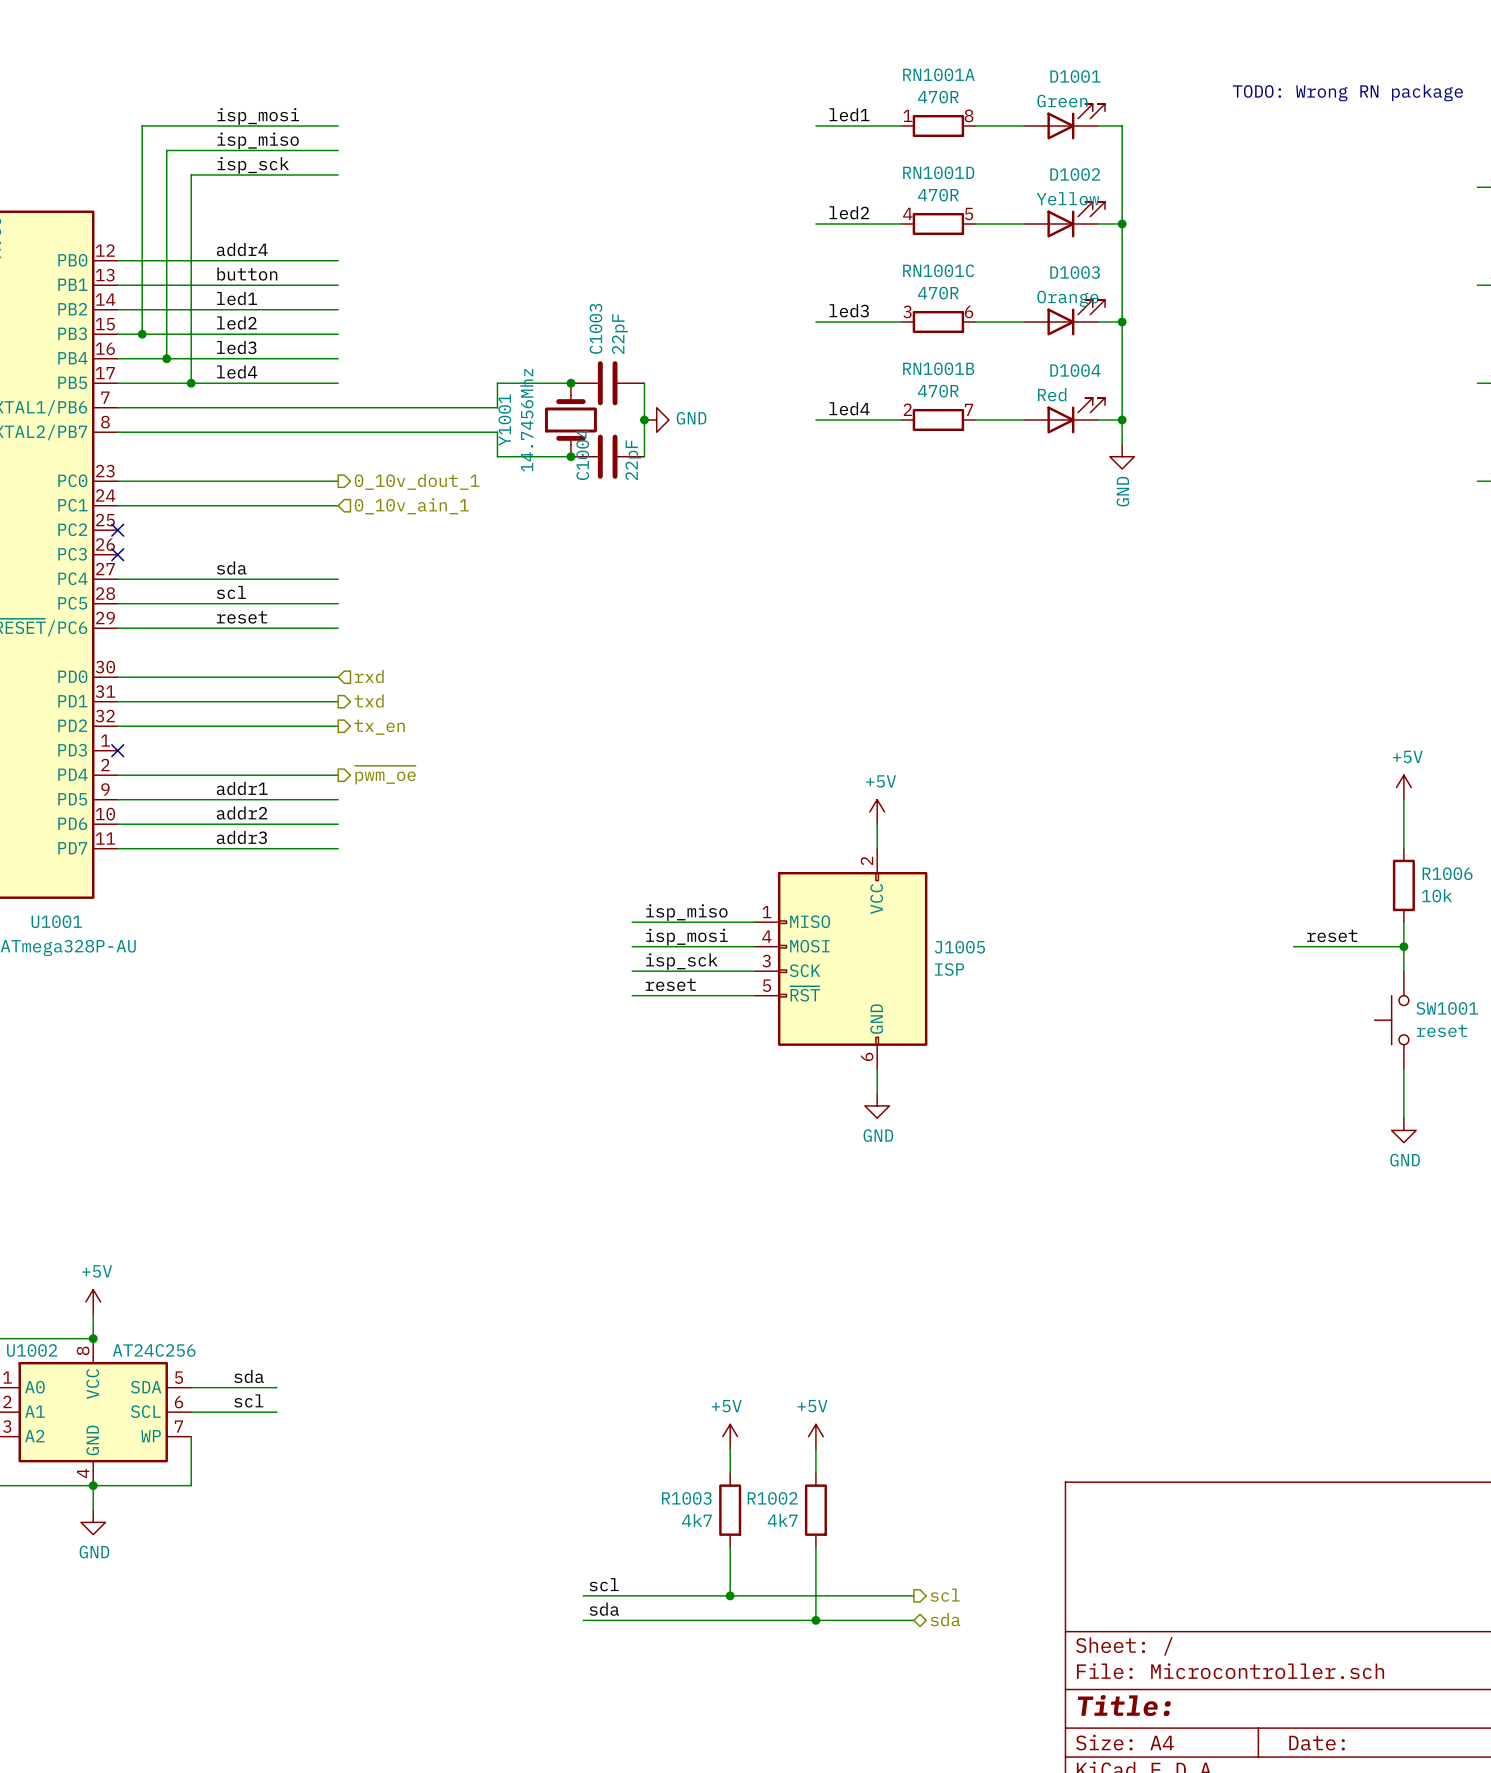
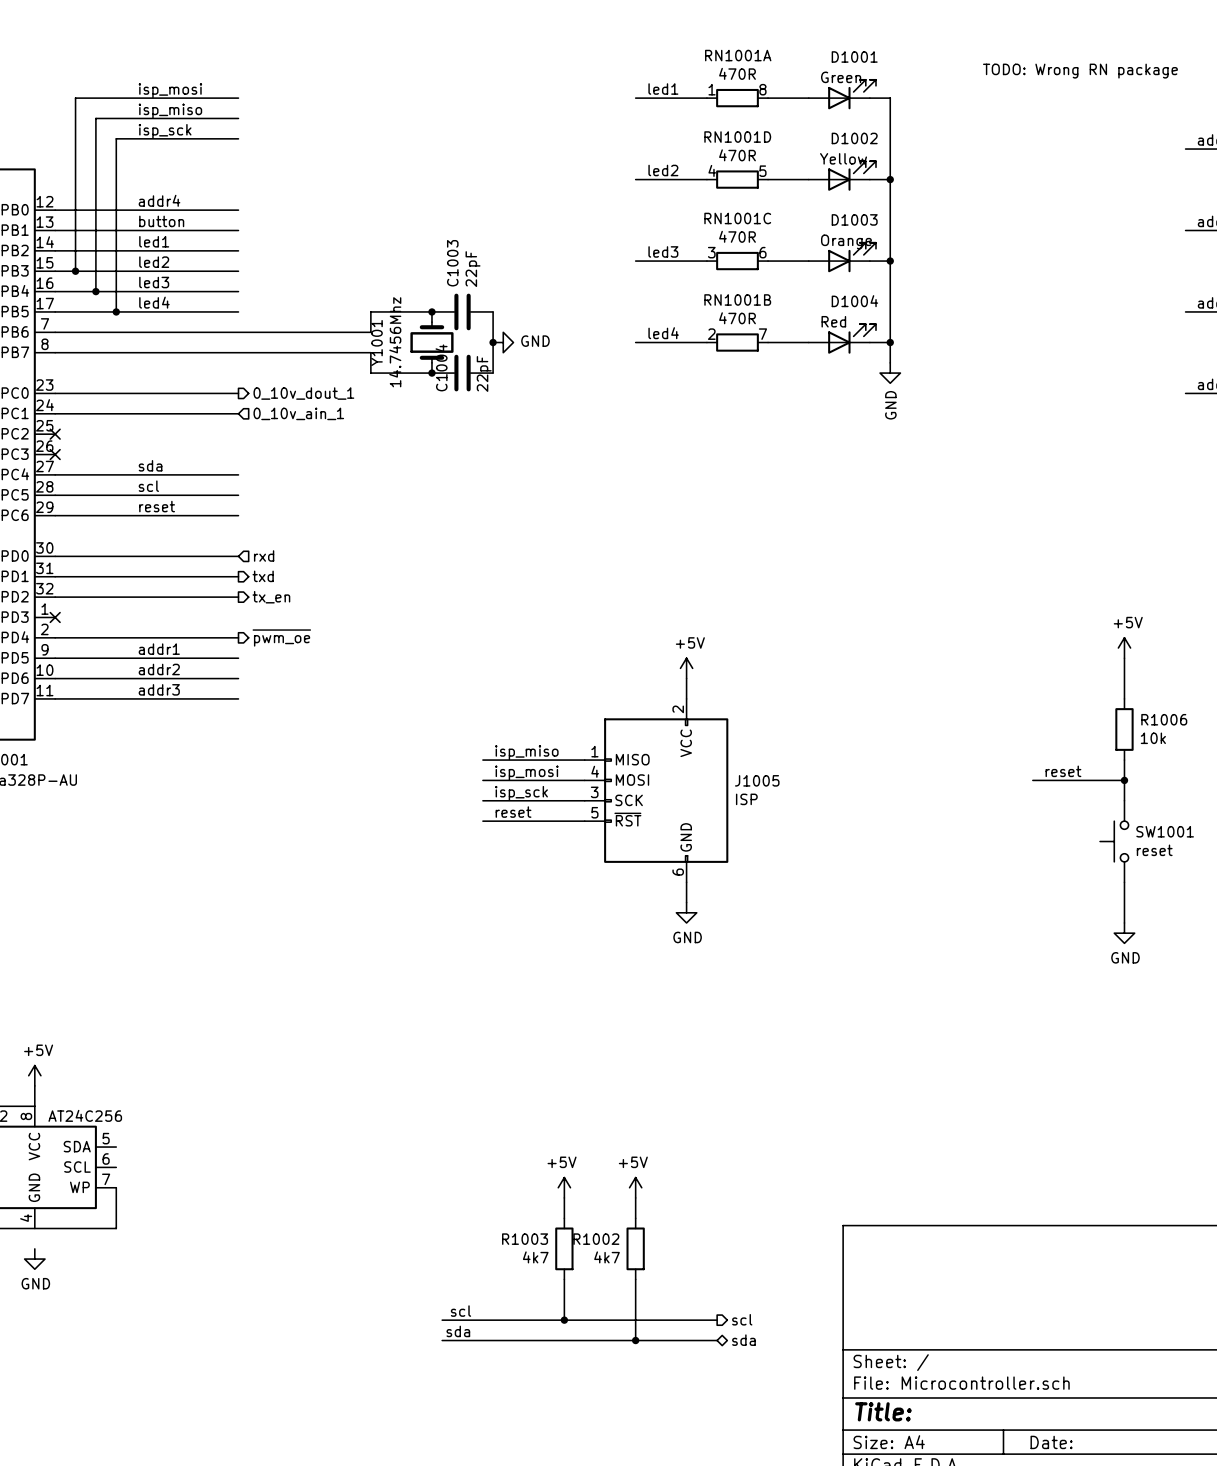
junction: (93, 1338) -> none
label: sda (249, 1376) -> none
wire: (191, 1387) (276, 1387) -> none
label: scl (248, 1400) -> none
wire: (191, 1412) (276, 1412) -> none
wire: (93, 1485) (93, 1510) -> none
junction: (93, 1485) -> none

